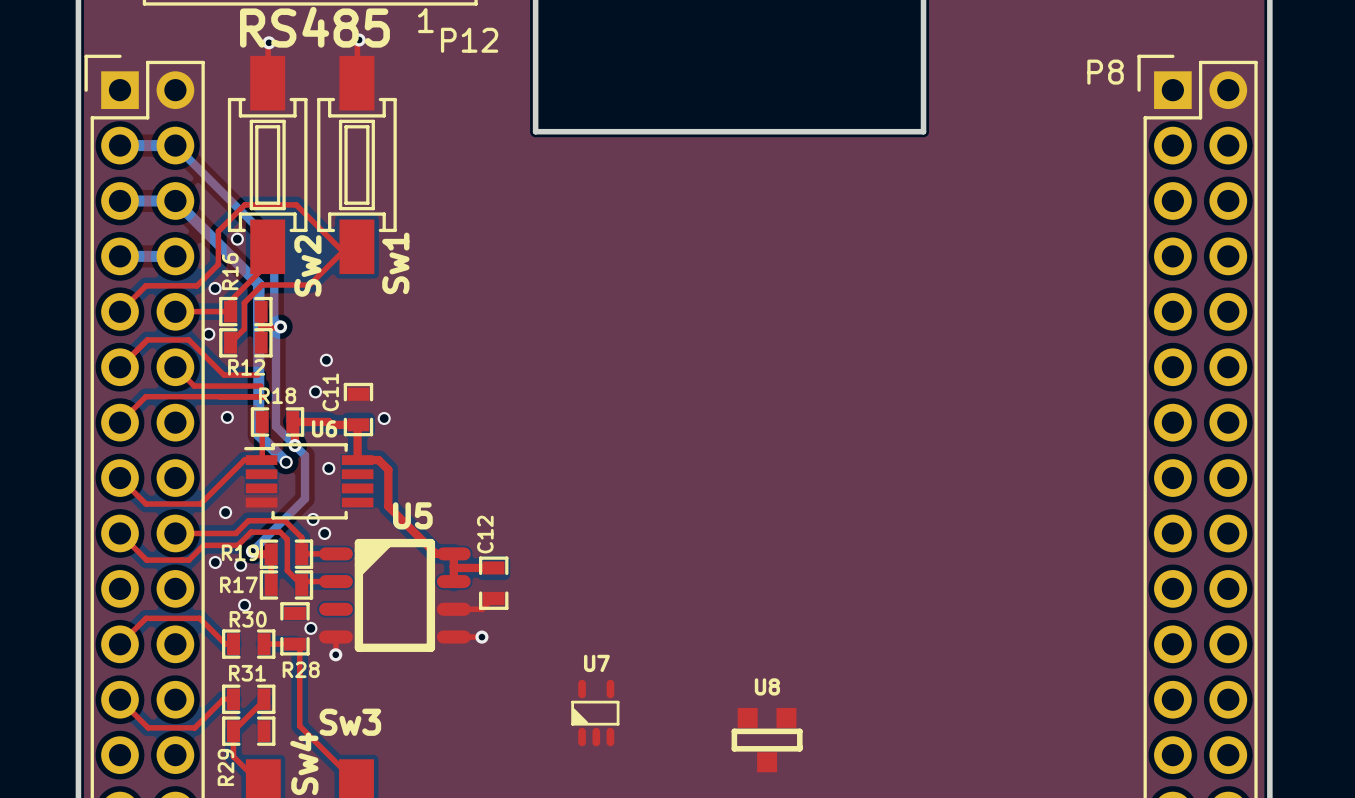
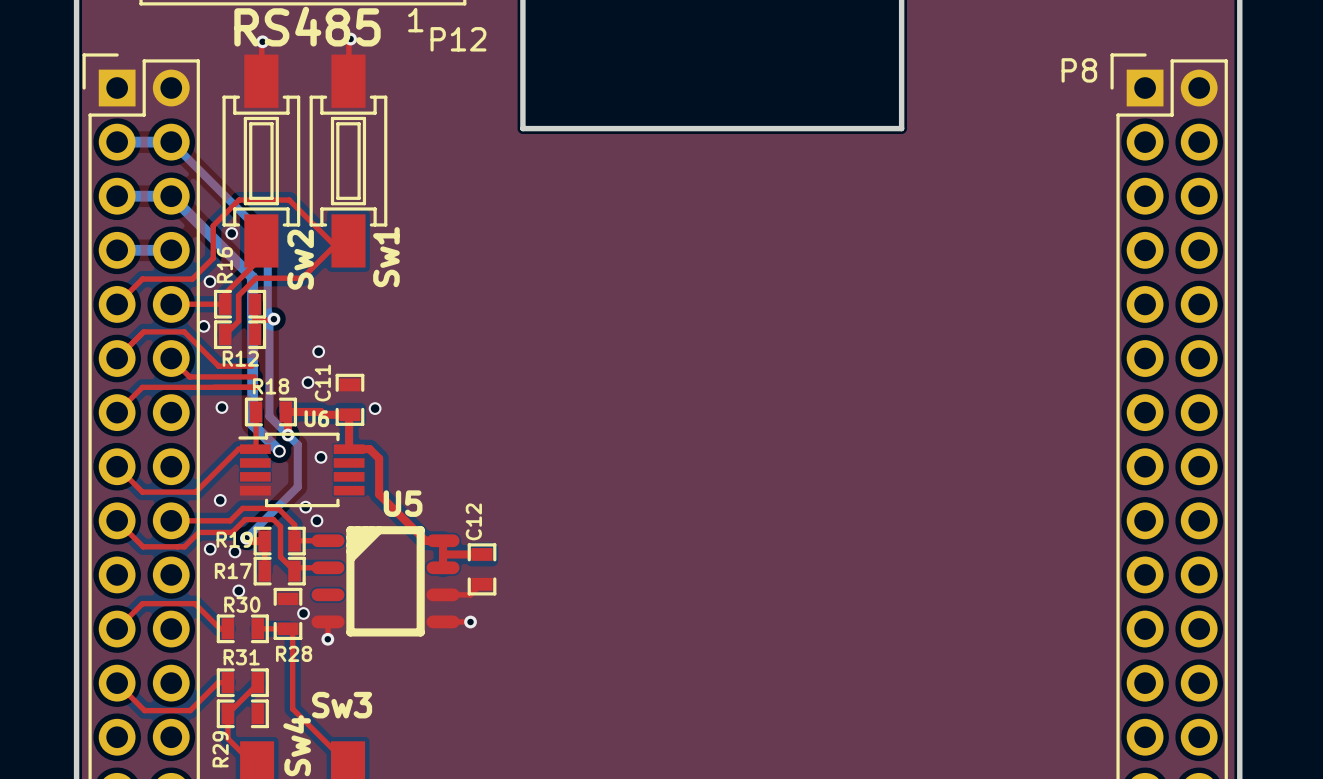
U7: (595, 713) -> none
U8: (767, 740) -> none

